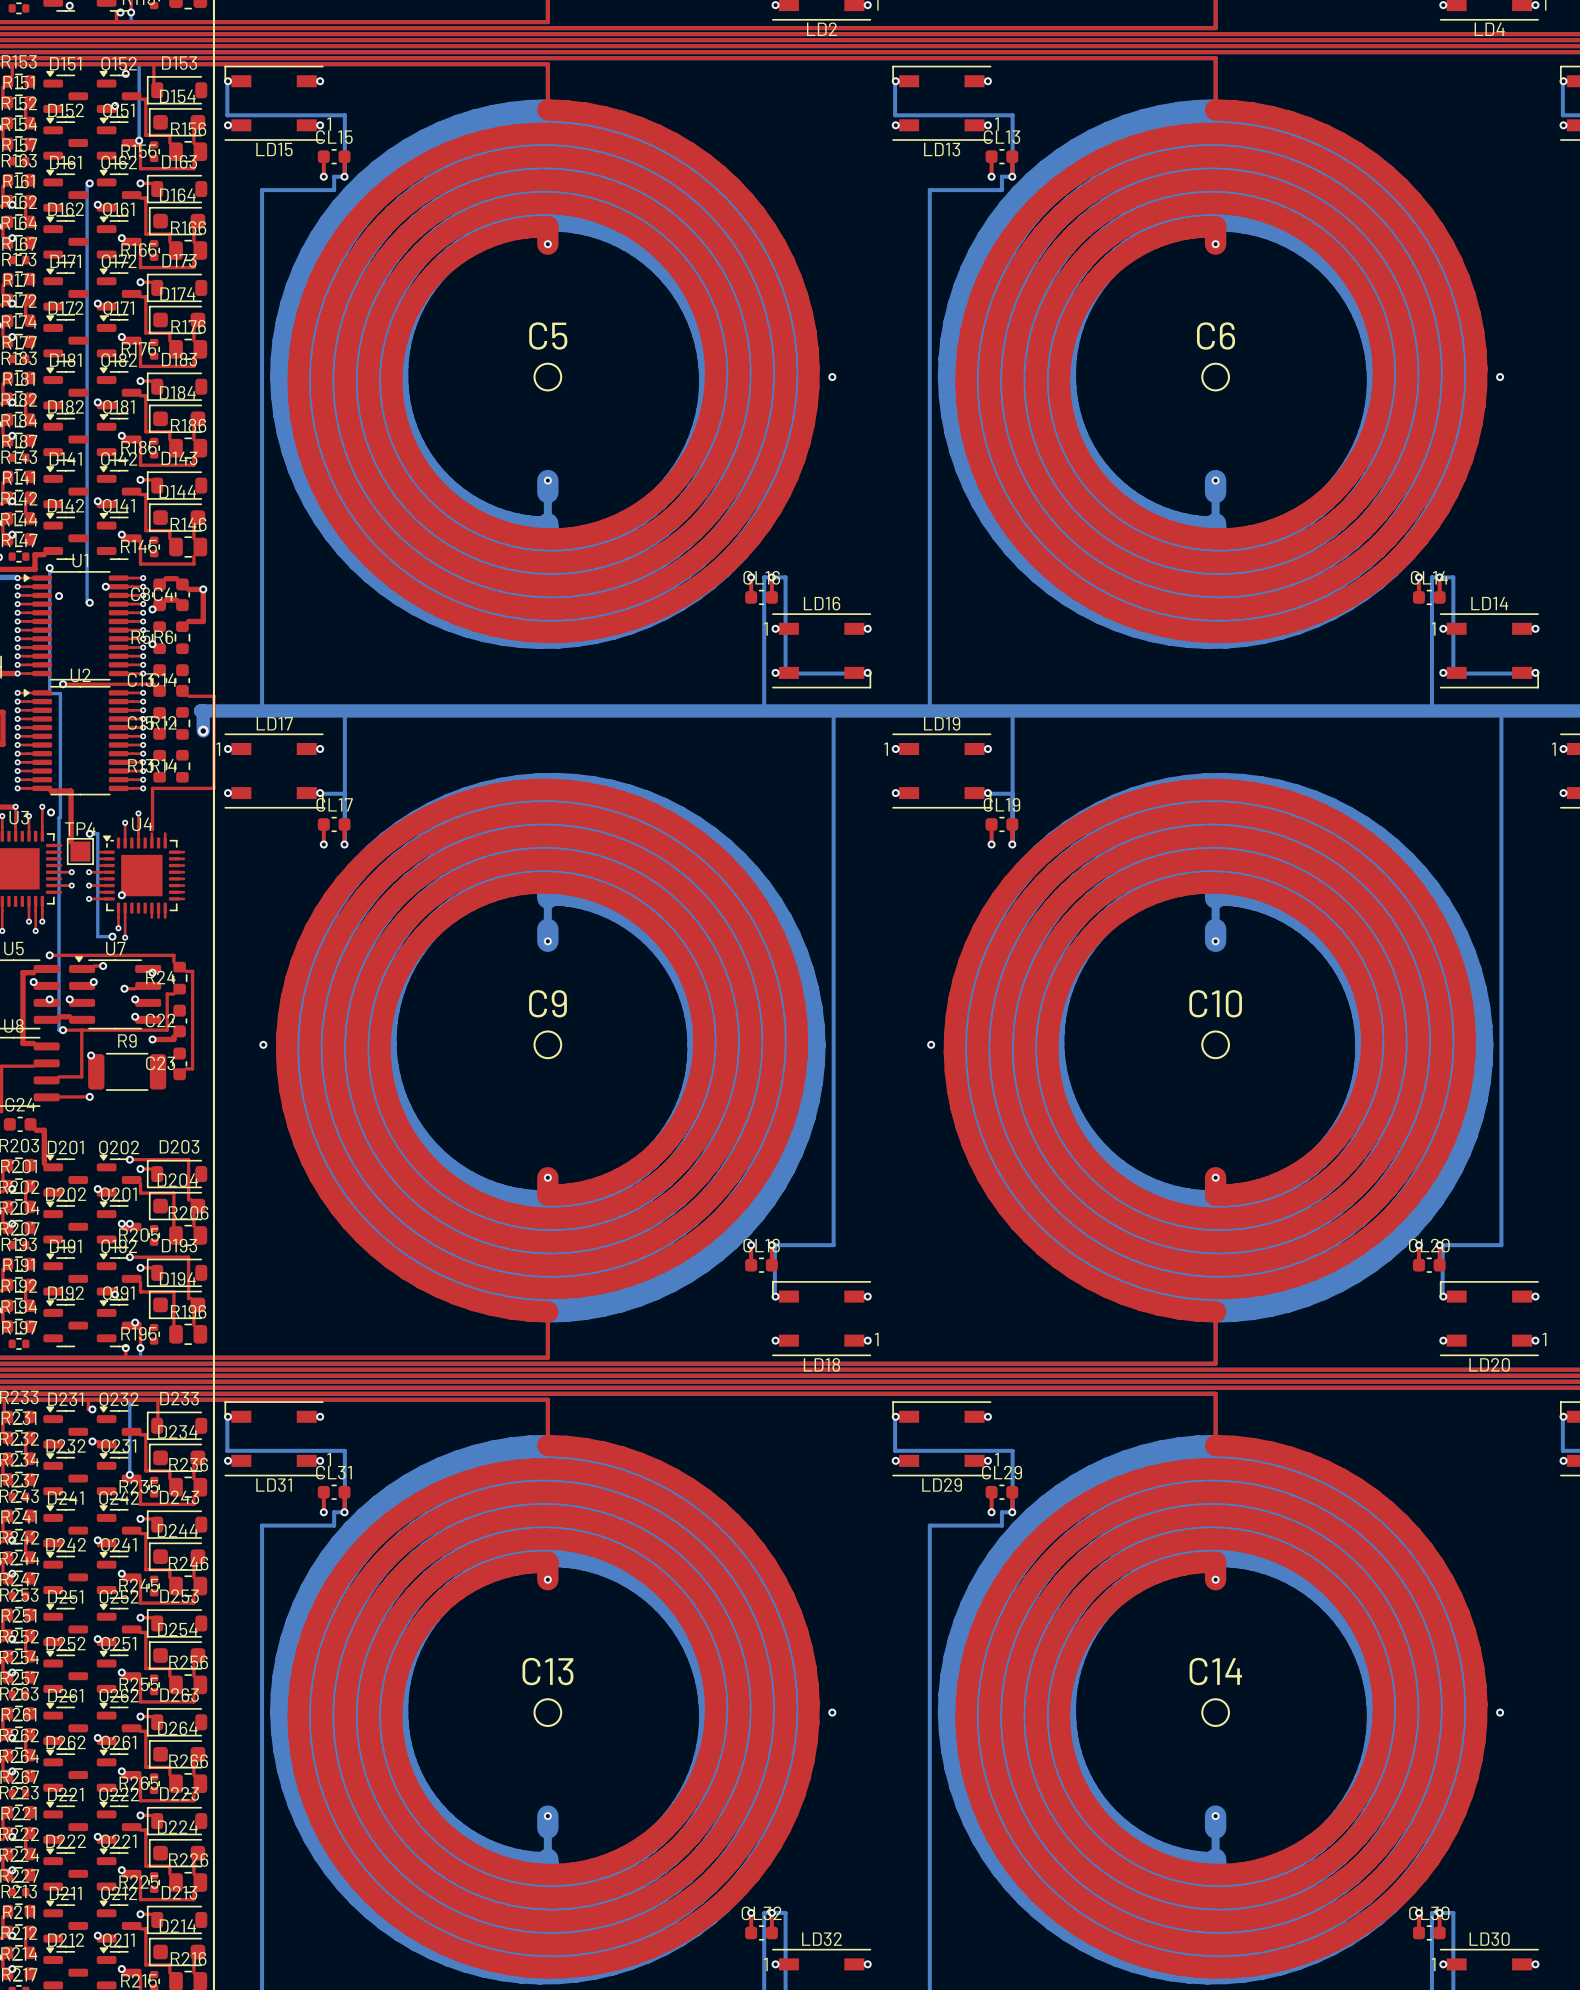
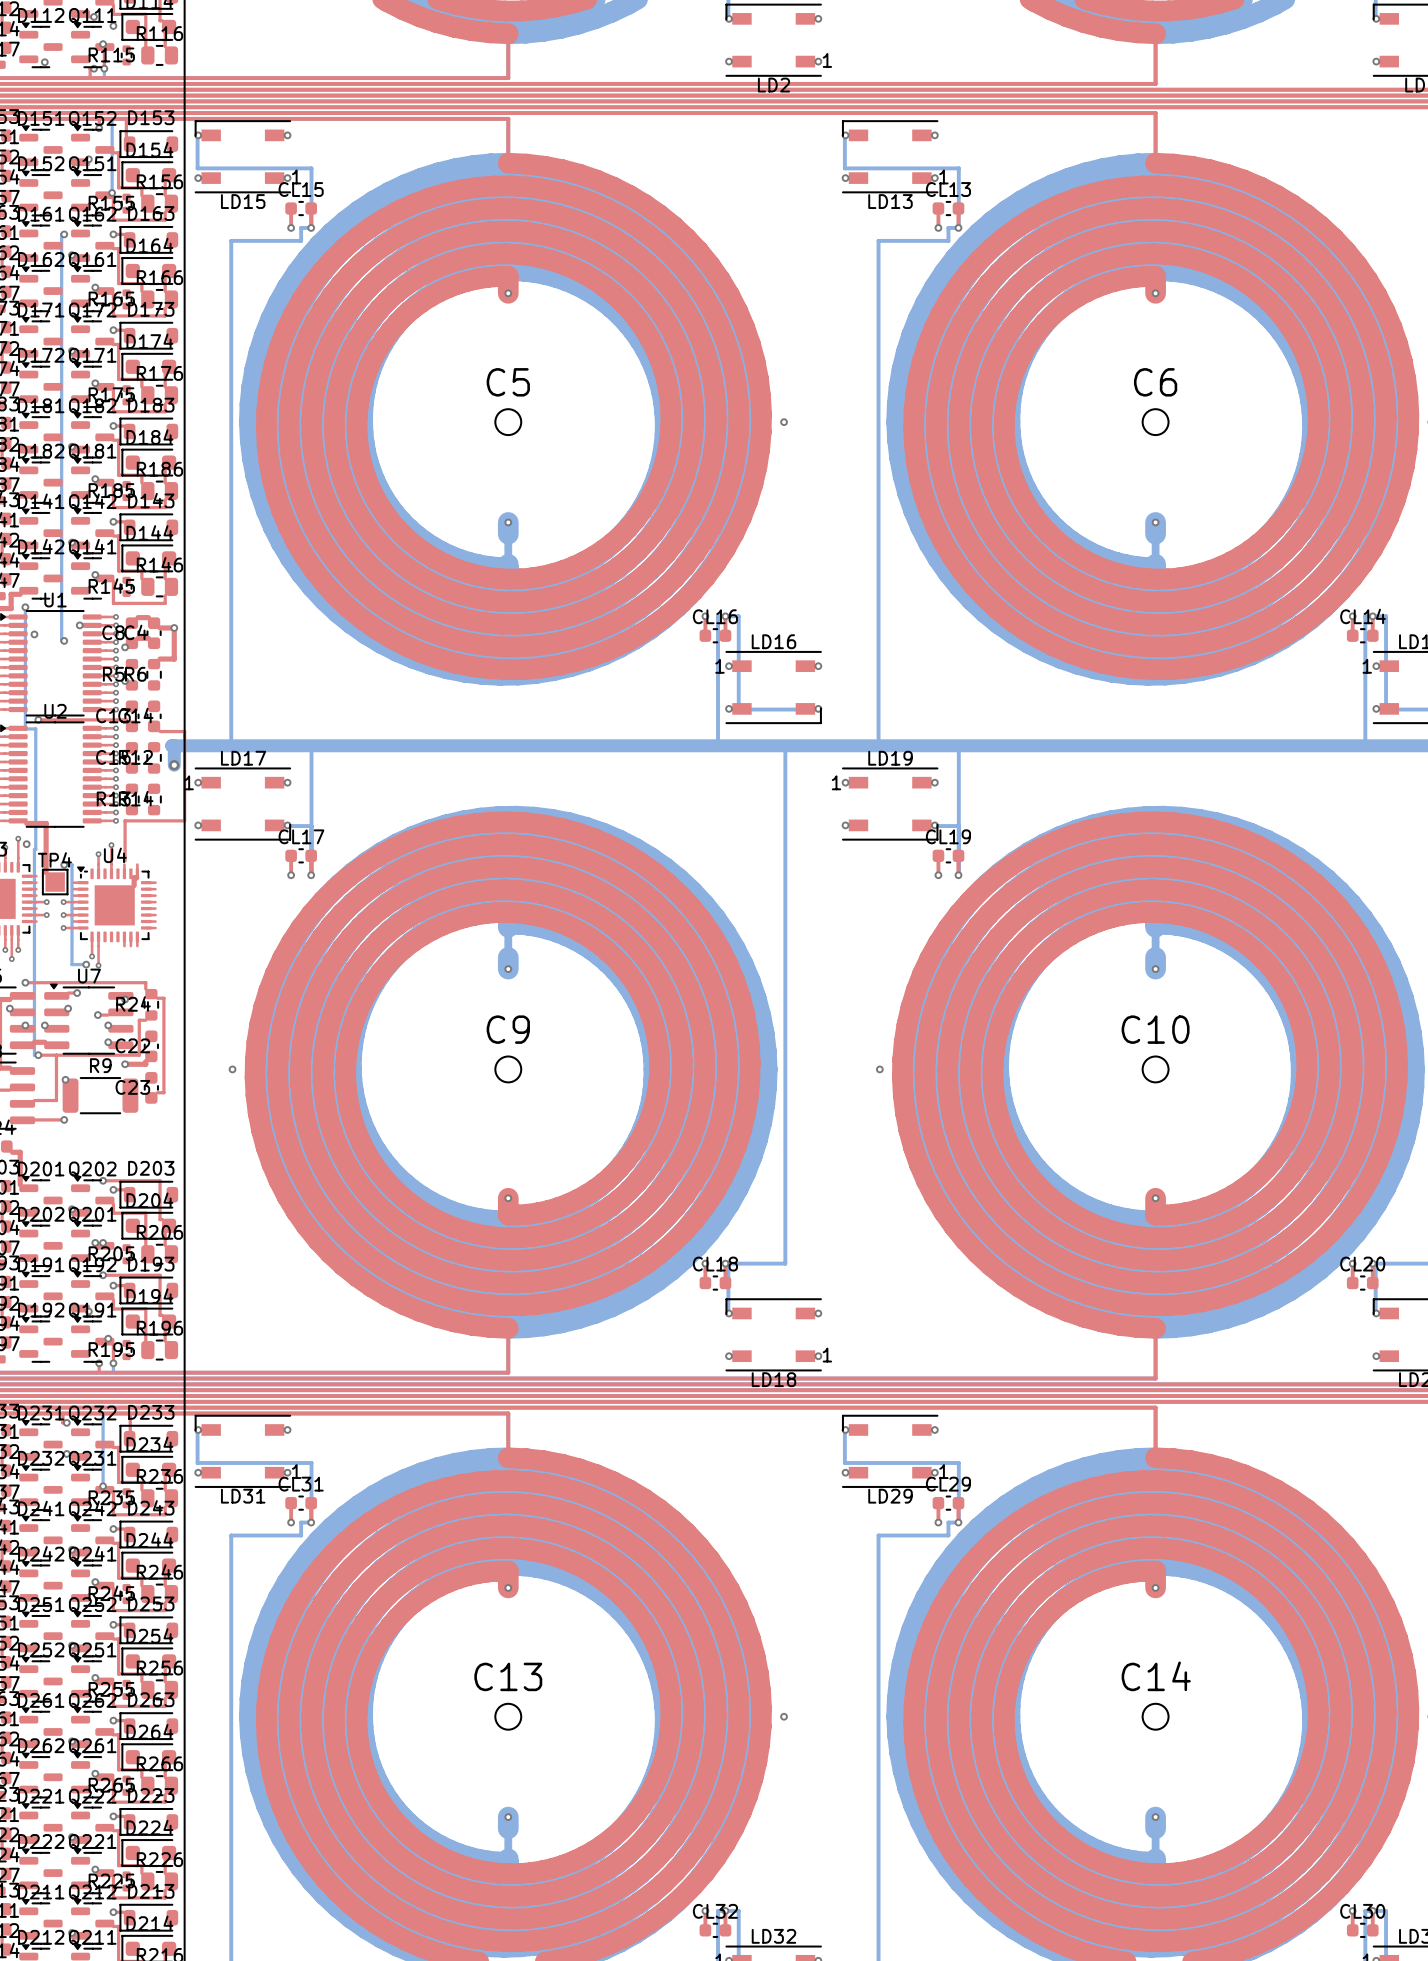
top track: none -> (136, 877) (134, 877) (134, 885)
via: (121, 895) -> none

